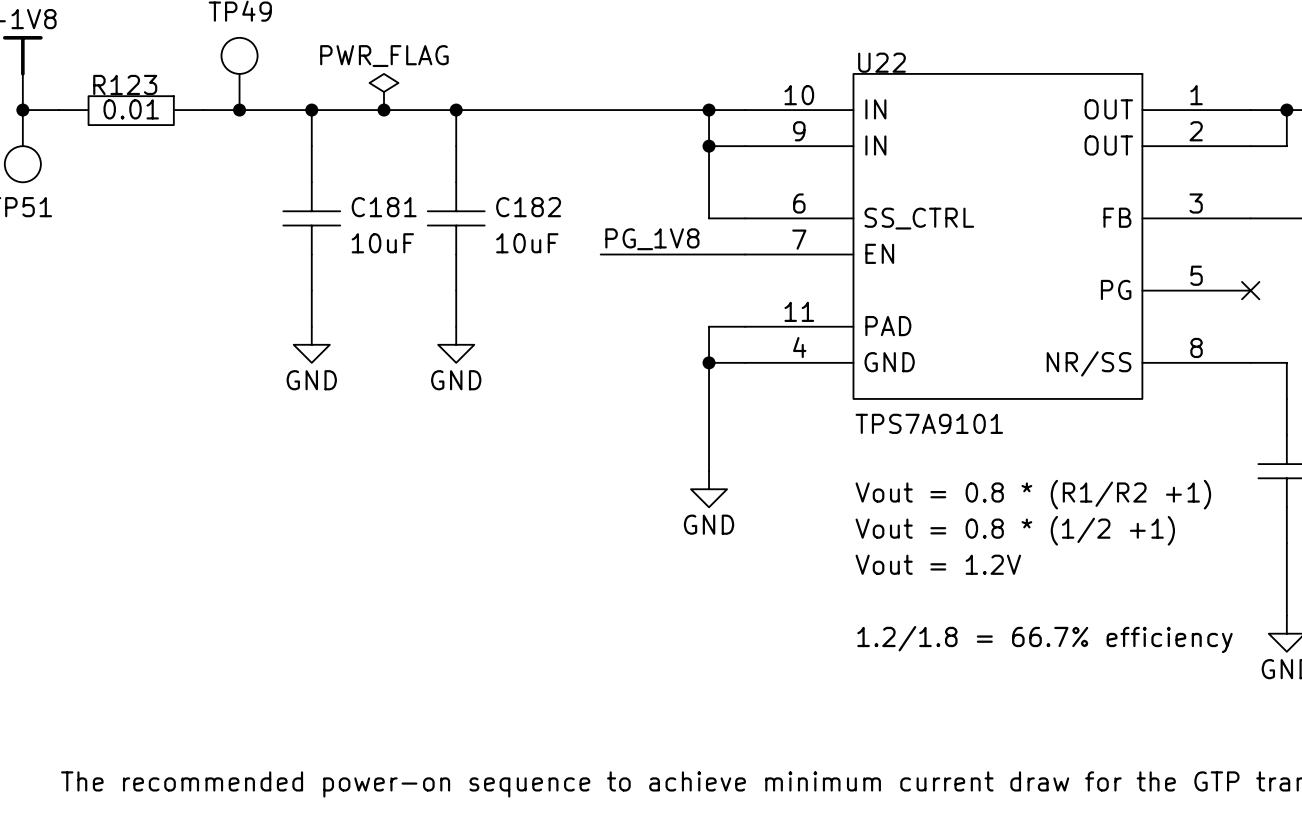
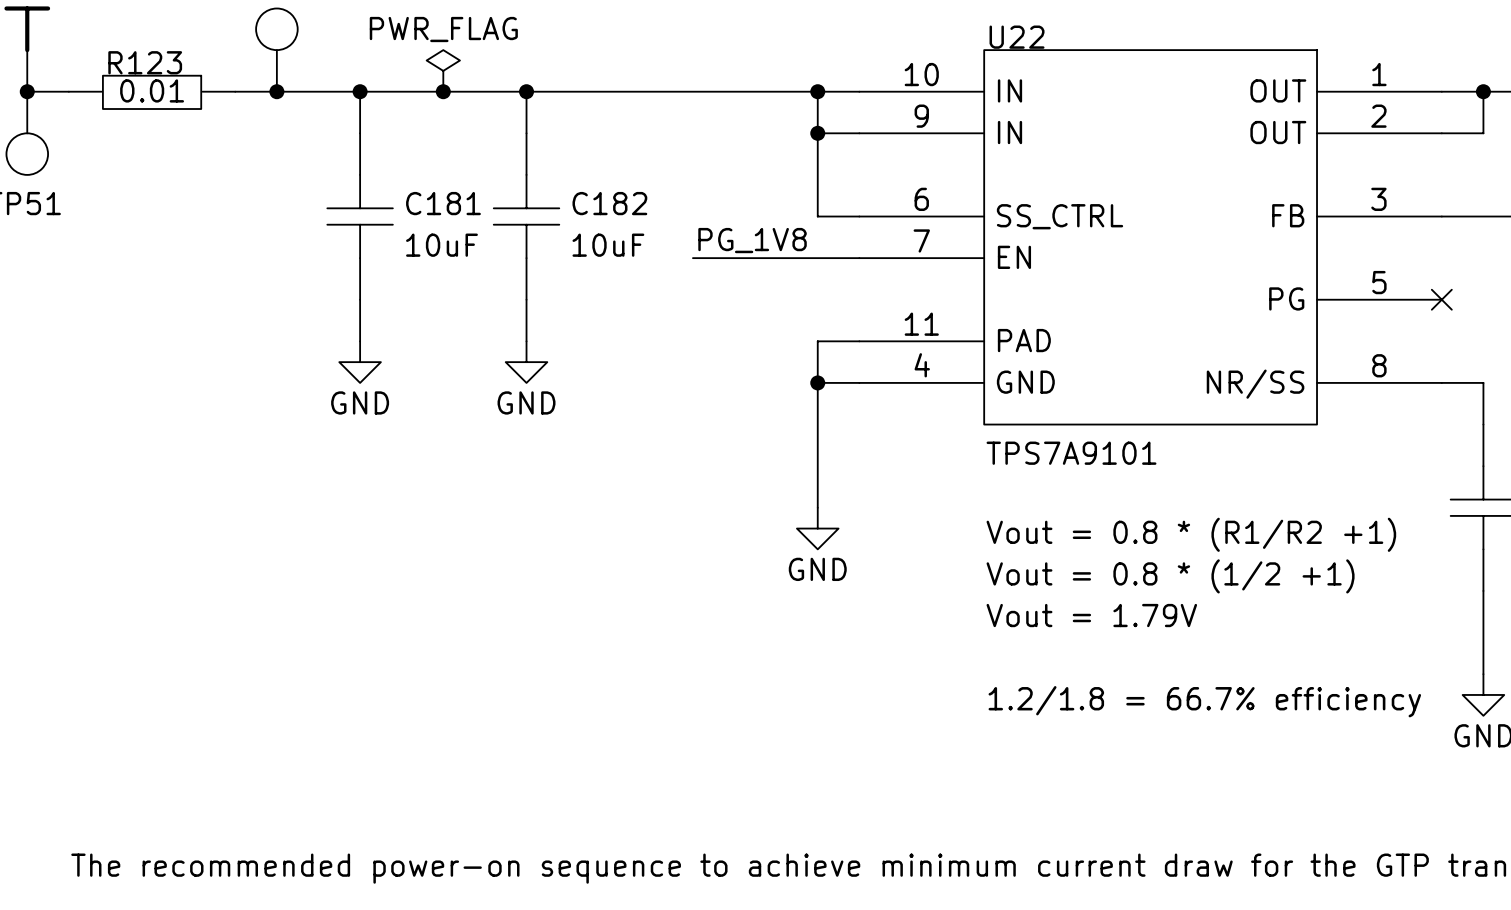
text: Vout = 1.2V (938, 564) -> Vout = 1.79V (1091, 615)

